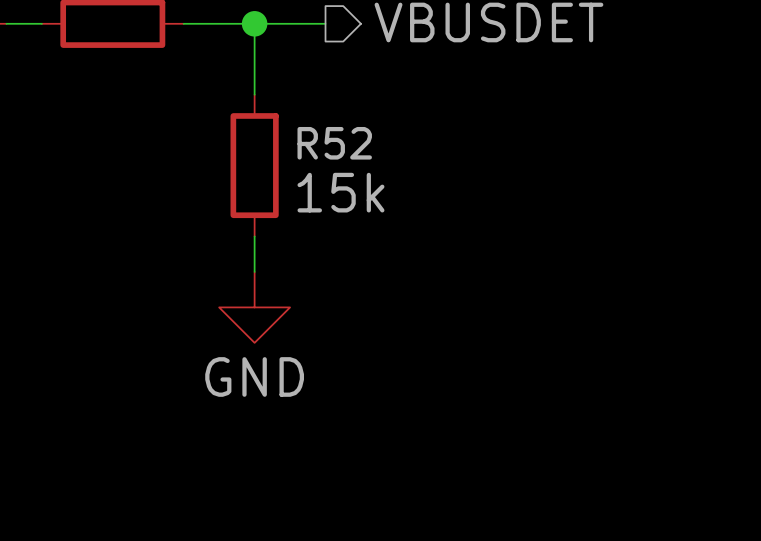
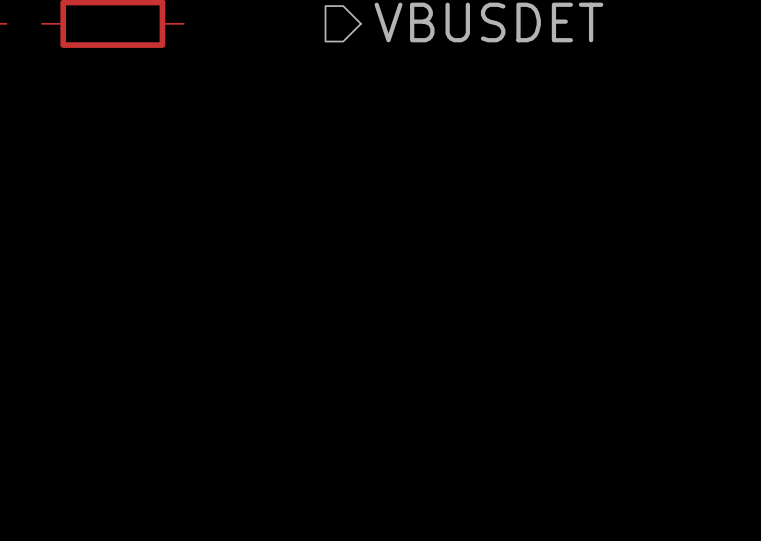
wire: (6, 23) (41, 23) -> none
wire: (183, 23) (325, 23) -> none
wire: (254, 23) (254, 94) -> none
junction: (254, 23) -> none
R52: 15k (254, 165) -> none
wire: (254, 236) (254, 271) -> none
power symbol: GND (254, 307) -> none

